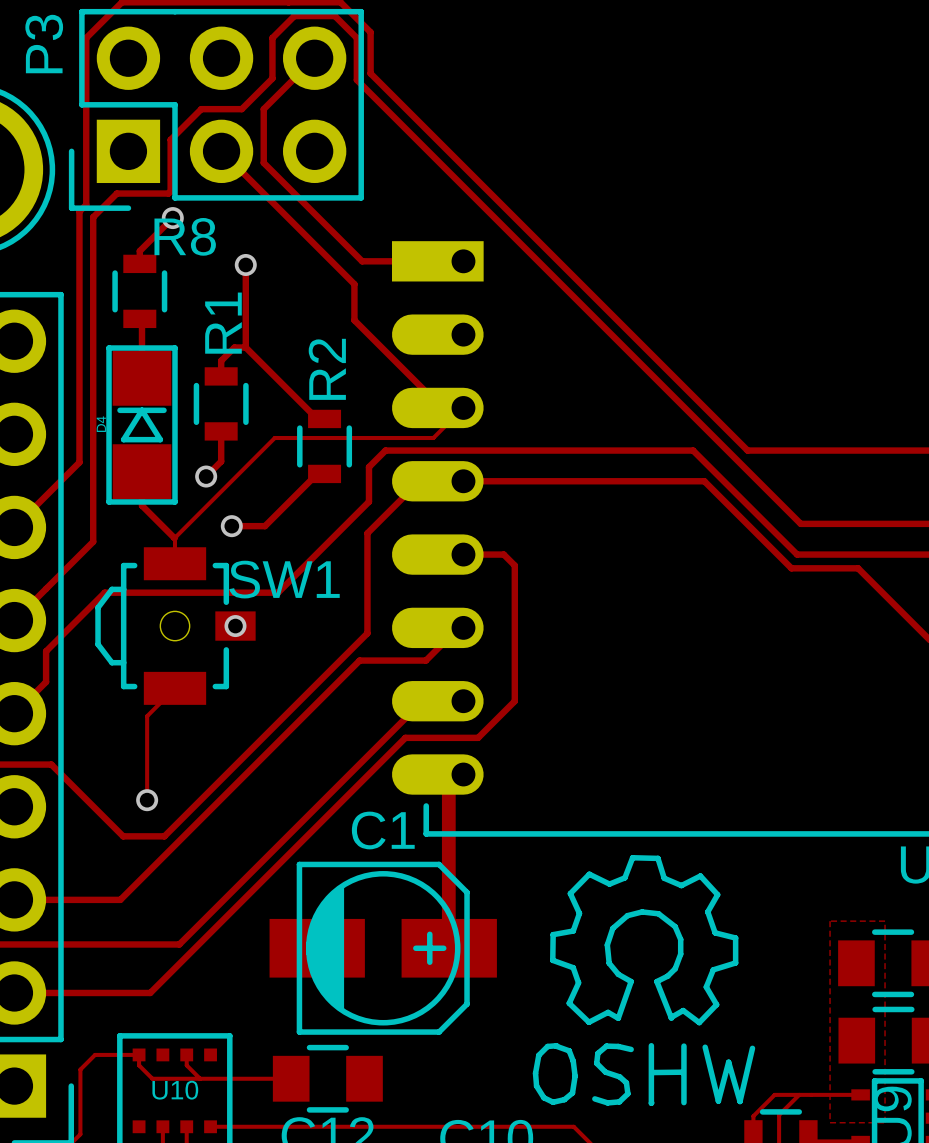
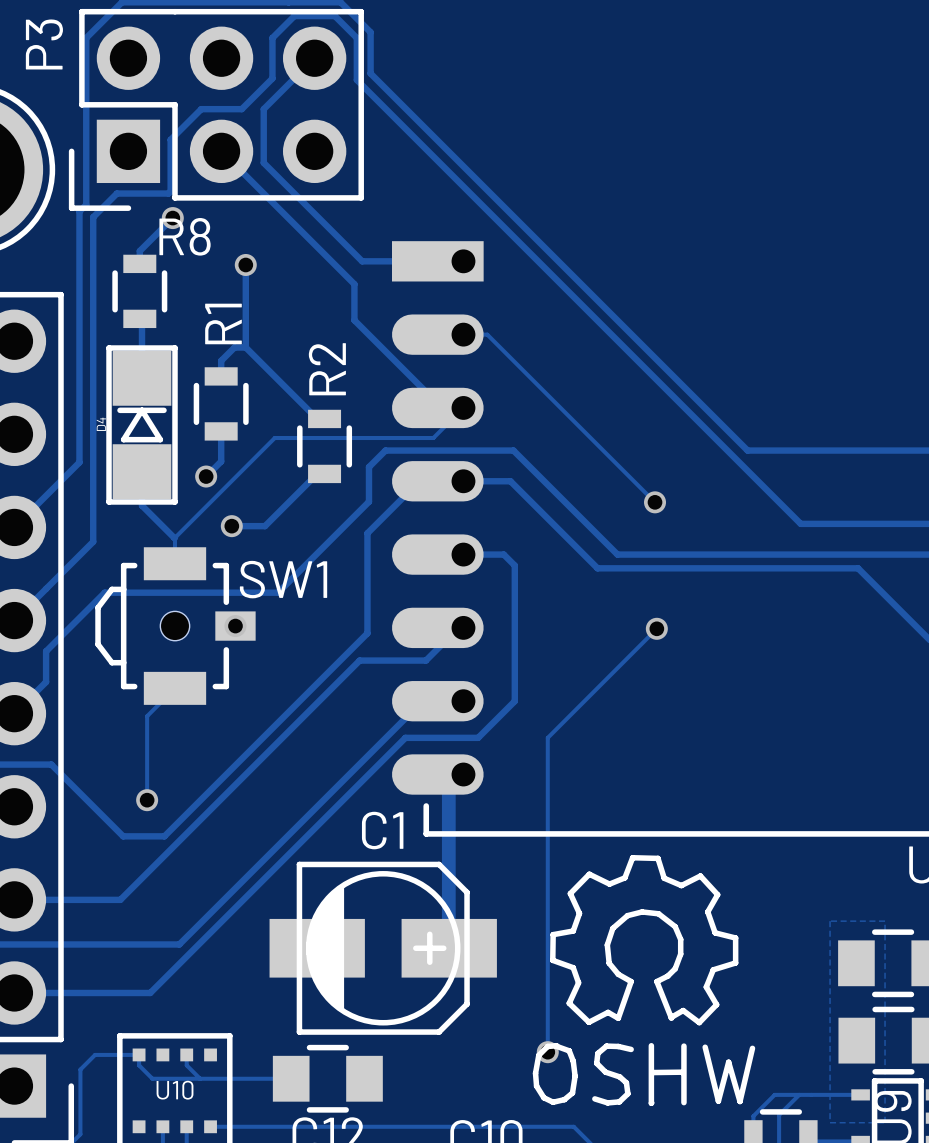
track: none -> (463, 334) (487, 334) (655, 502)
track: (513, 450) (693, 450) (797, 554) -> (513, 450) (617, 554) (797, 554)
track: (510, 481) (704, 481) (791, 568) (858, 568) -> (510, 481) (597, 568) (858, 568)
via: none -> (655, 502)
track: none -> (656, 628) (547, 737) (547, 1052)
via: none -> (656, 628)
via: none -> (547, 1052)

